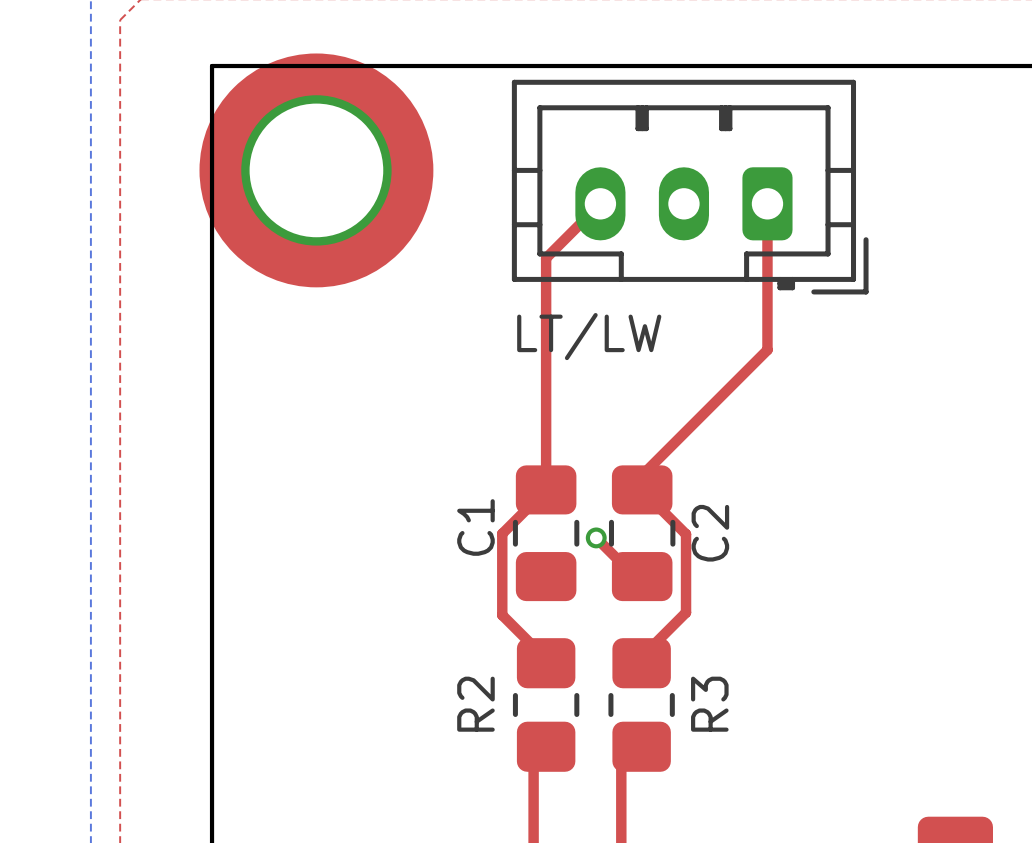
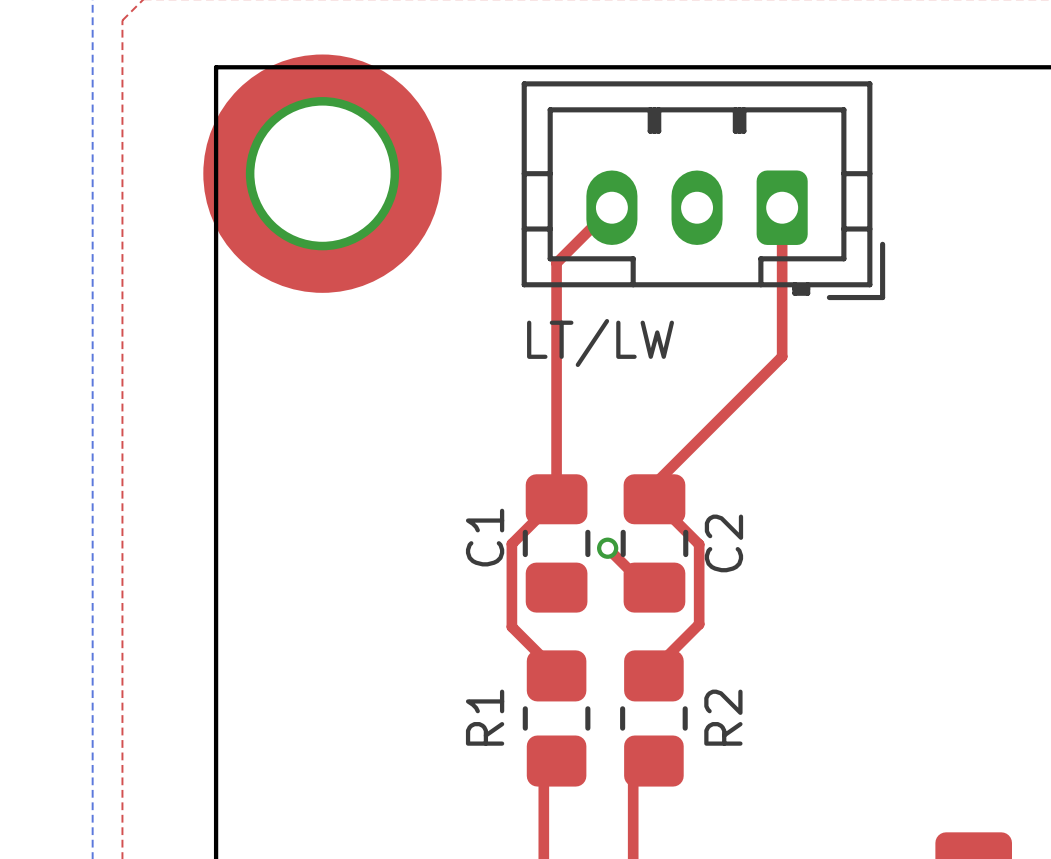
R2 name: R2 (475, 704) -> R1 (485, 717)
R3 name: R3 (709, 704) -> R2 (723, 717)

